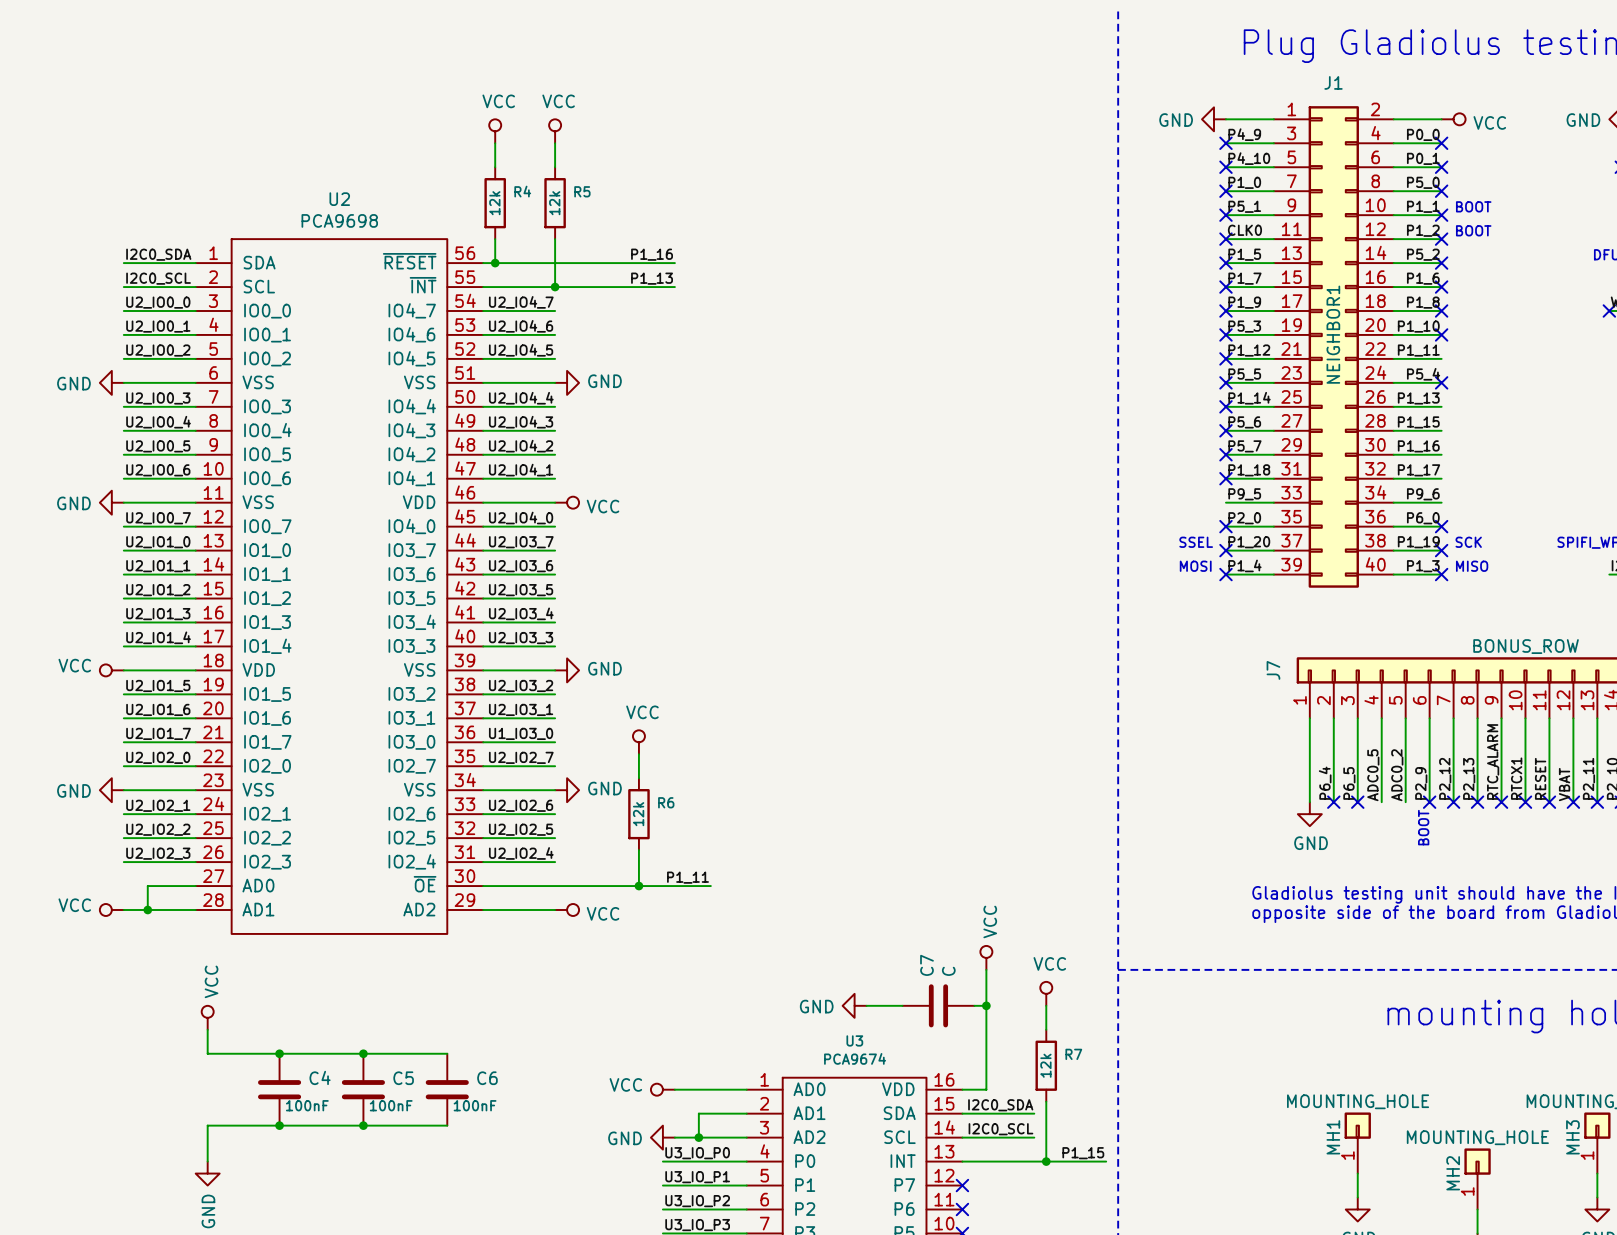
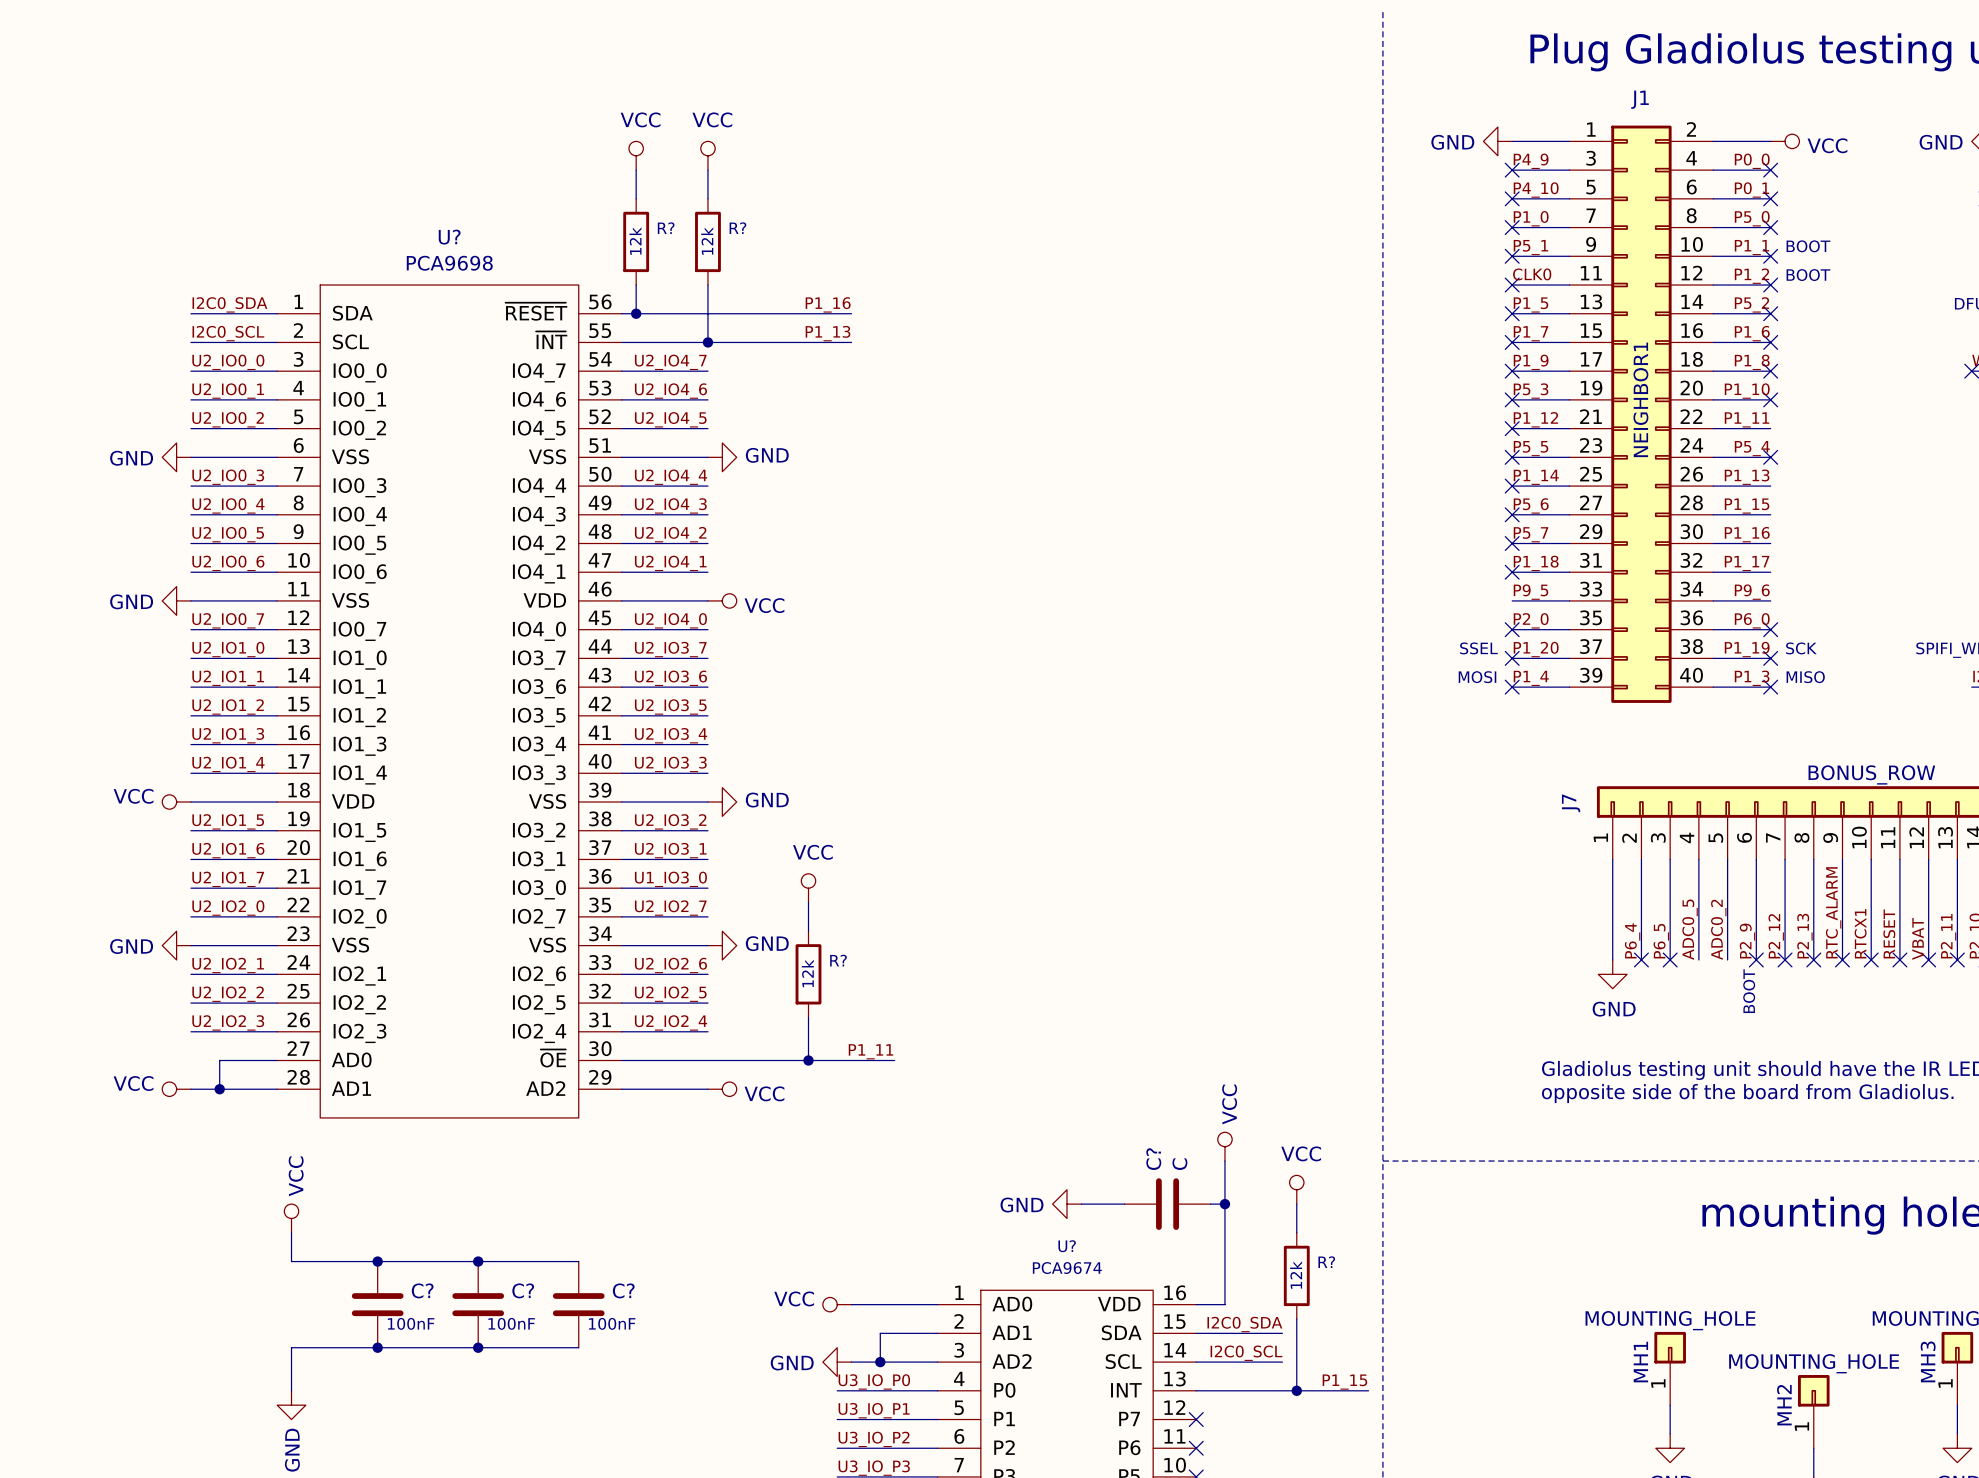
R4 name: R4 (522, 191) -> R? (666, 228)
R5 name: R5 (582, 191) -> R? (737, 228)
U2 name: U2 (339, 199) -> U? (449, 237)
R6 name: R6 (666, 802) -> R? (838, 960)
C7 name: C7 (926, 965) -> C? (1153, 1159)
U3 name: U3 (854, 1040) -> U? (1067, 1246)
R7 name: R7 (1073, 1054) -> R? (1326, 1262)
C4 name: C4 (320, 1077) -> C? (422, 1290)
C5 name: C5 (403, 1078) -> C? (523, 1290)
C6 name: C6 (487, 1078) -> C? (623, 1290)

